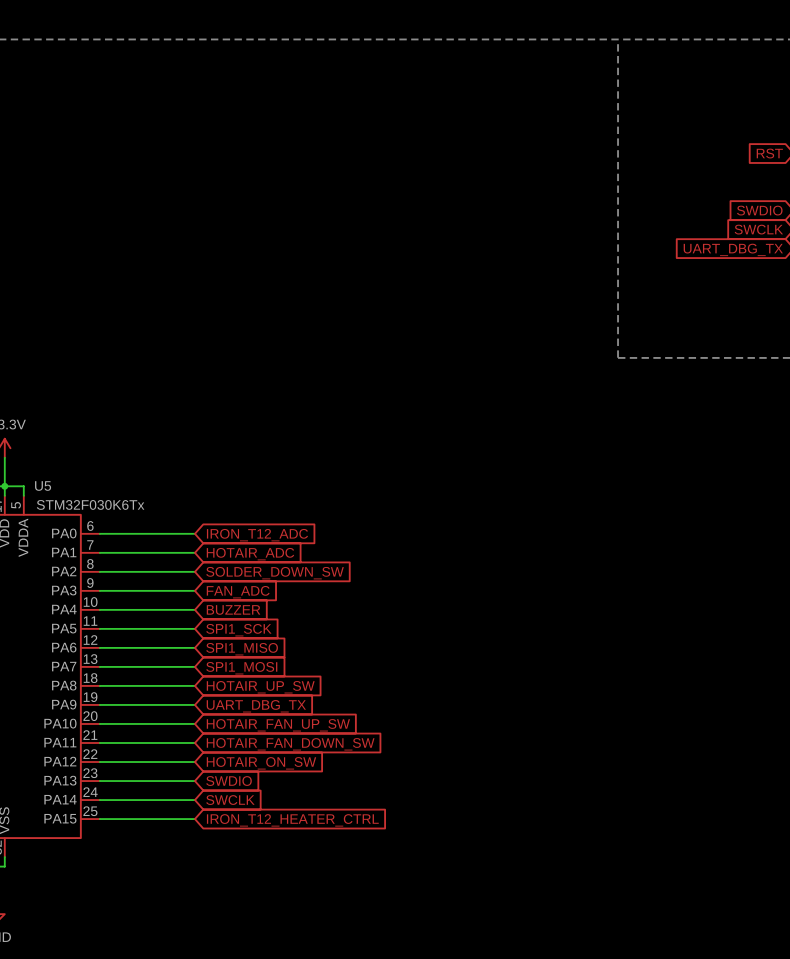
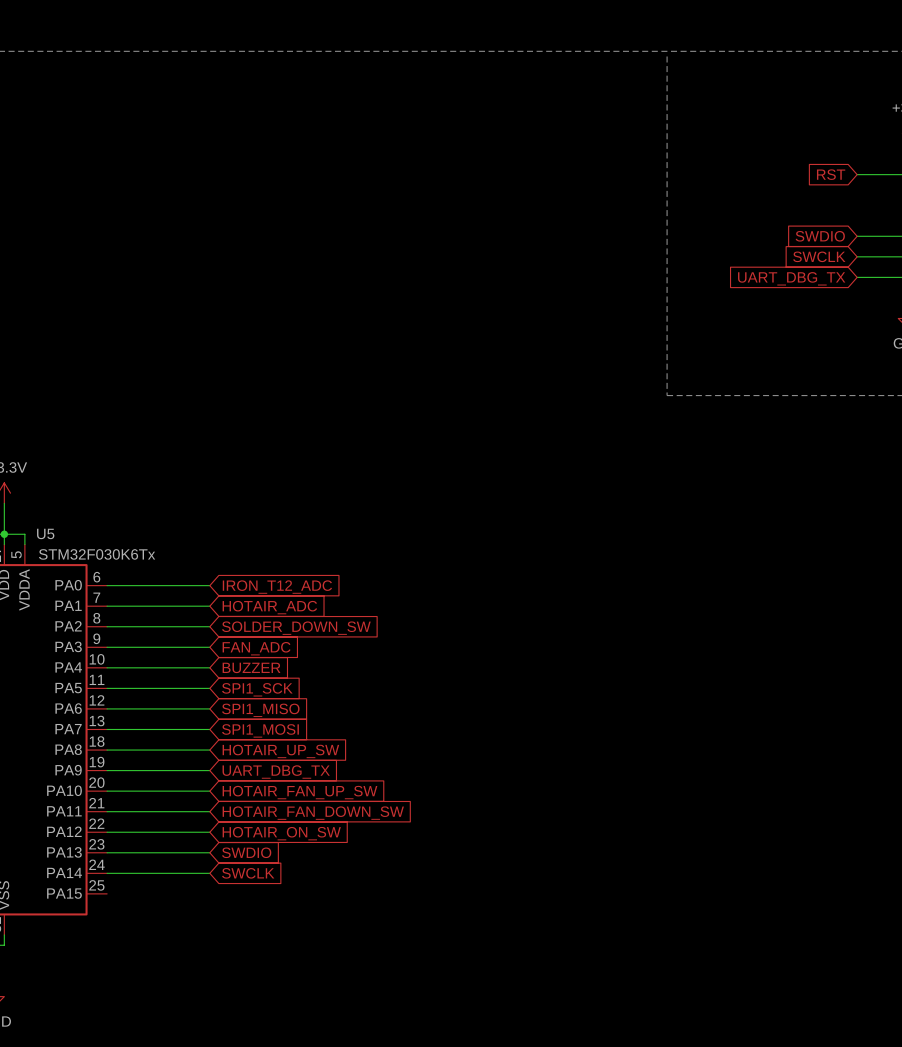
wire: (99, 819) (194, 819) -> none
global label: IRON_T12_HEATER_CTRL (292, 820) -> none

